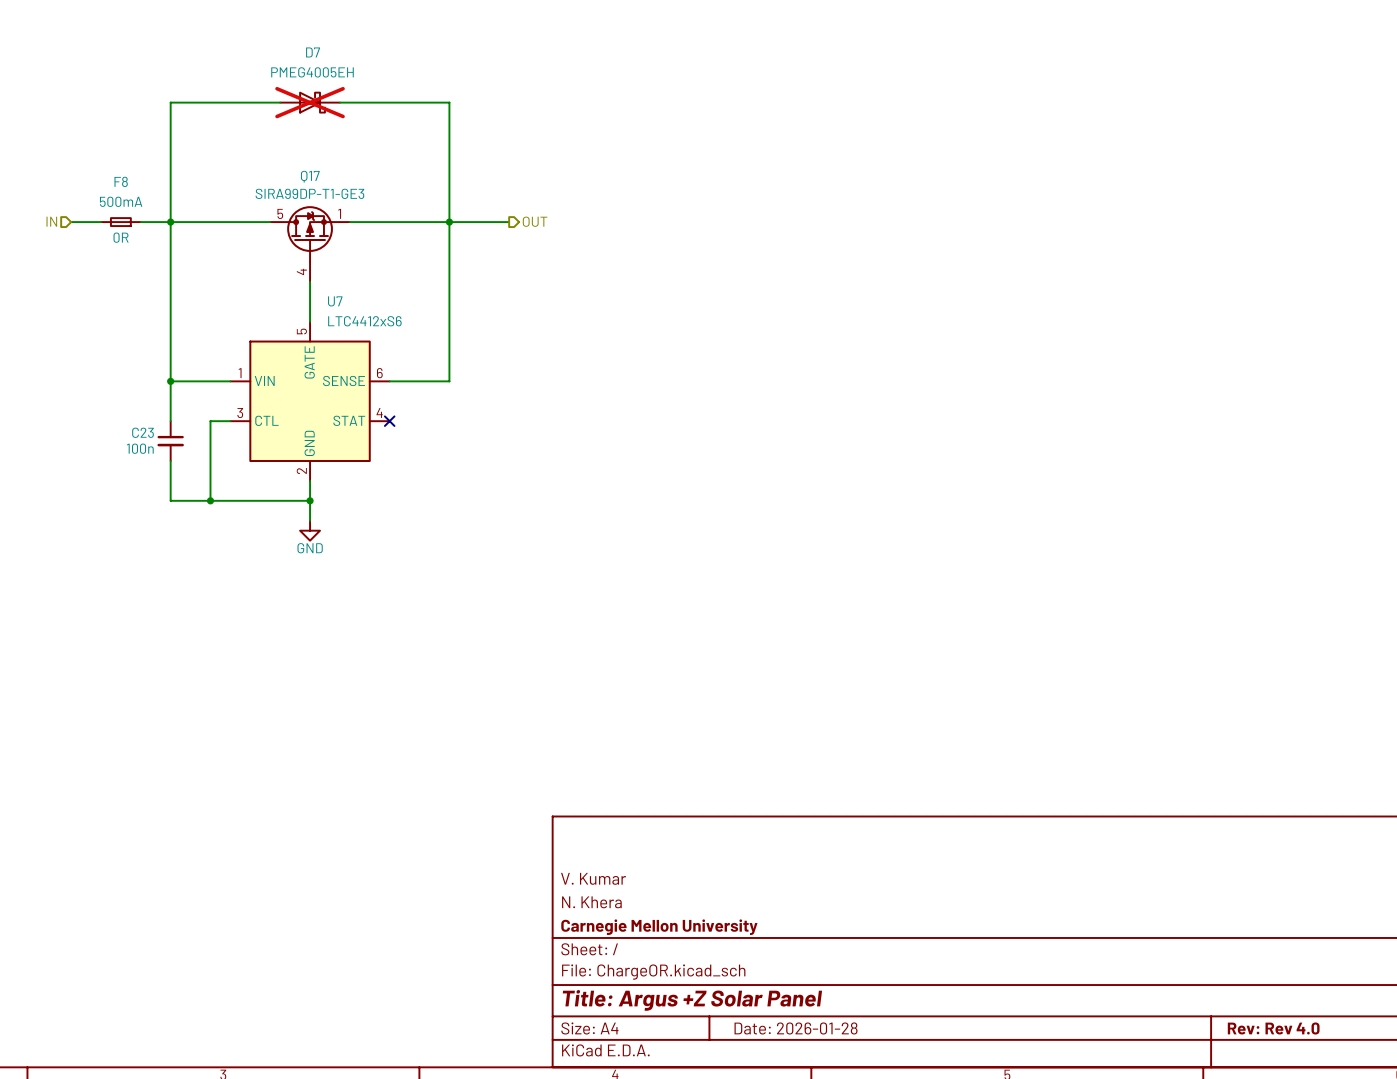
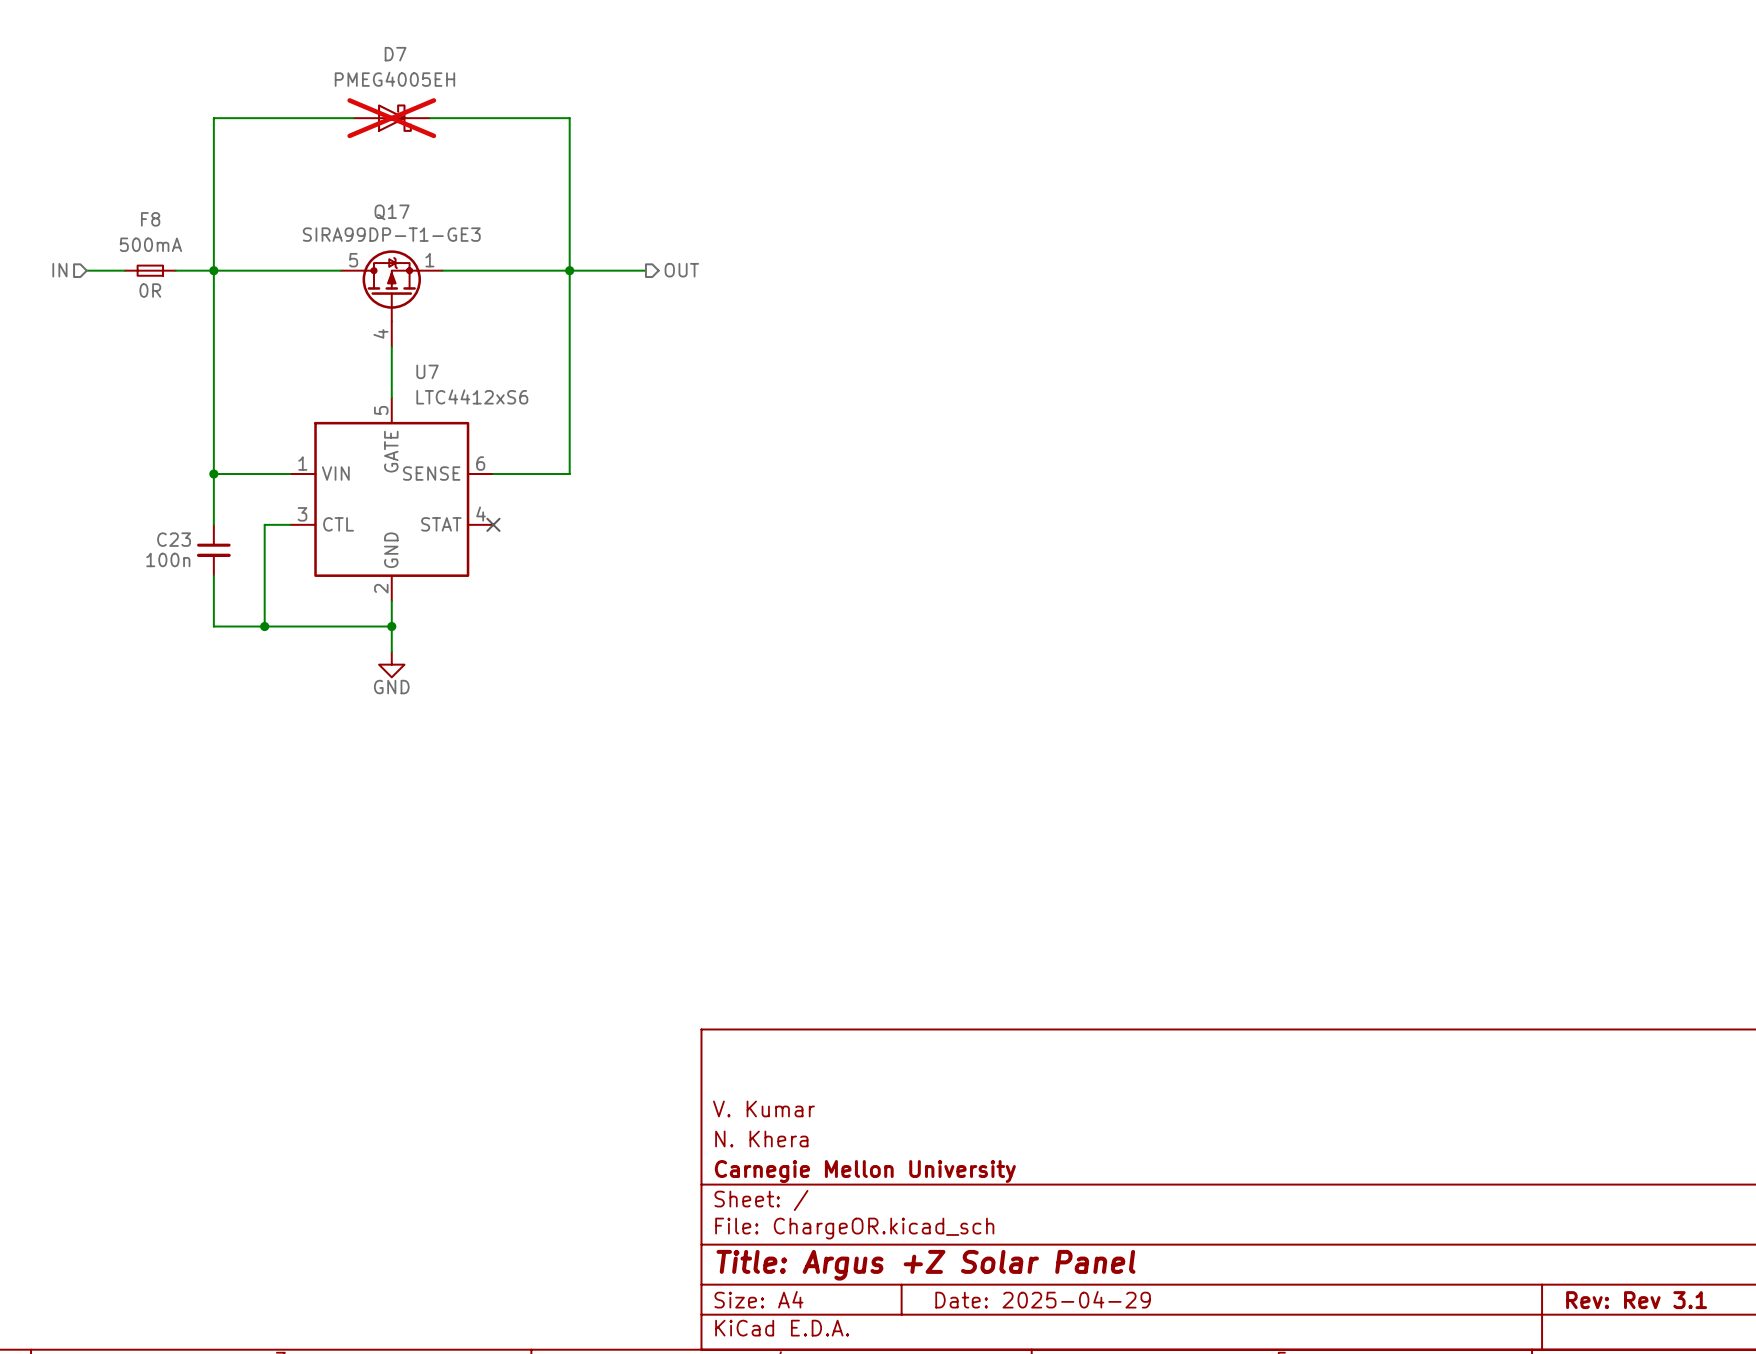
title block: Date: 2026-01-28 (796, 1028) -> Date: 2025-04-29 (1043, 1299)
title block: Rev: Rev 4.0 (1273, 1028) -> Rev: Rev 3.1 (1636, 1300)

